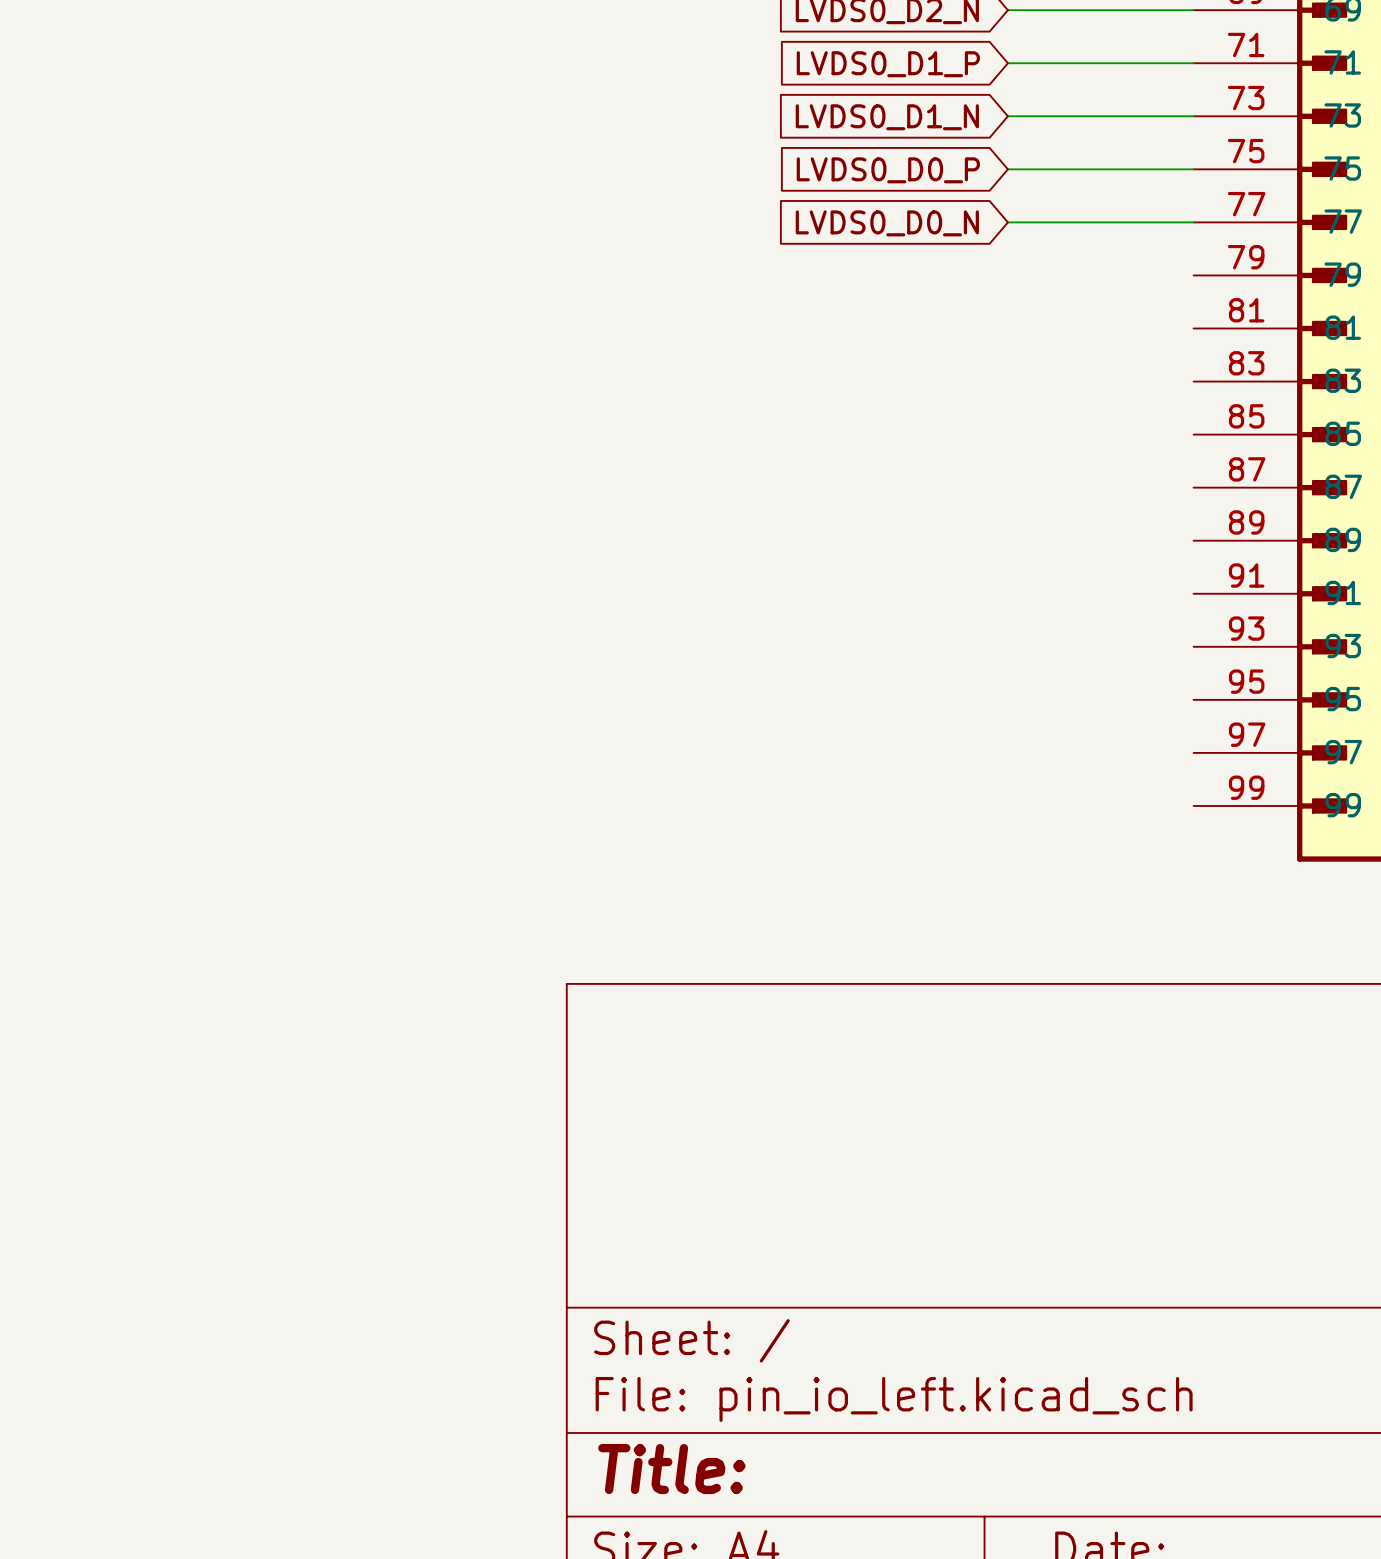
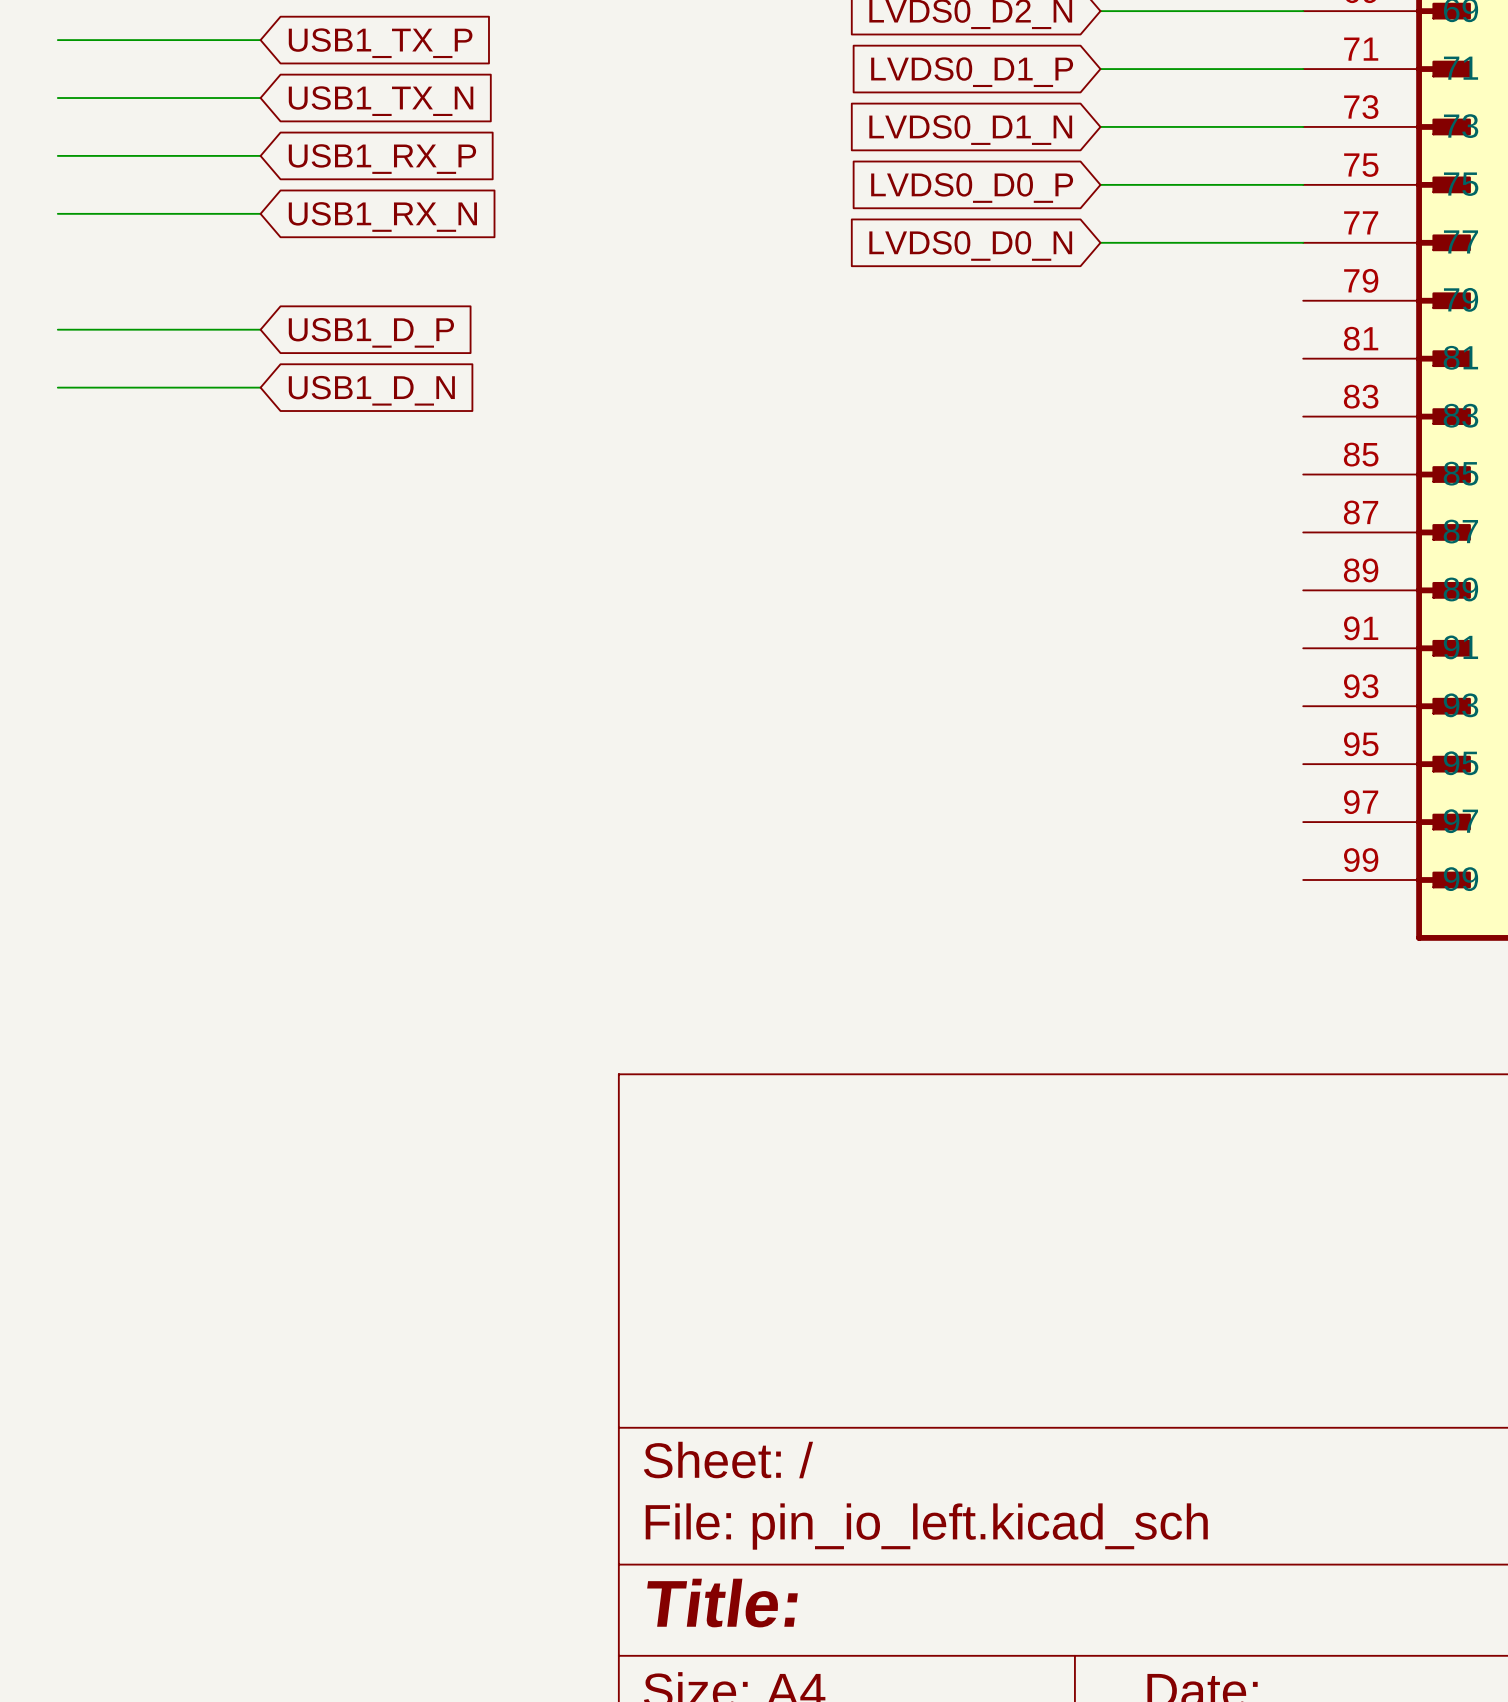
wire: none -> (57, 40) (260, 40)
global label: none -> USB1_TX_P (380, 43)
wire: none -> (57, 98) (260, 98)
global label: none -> USB1_TX_N (381, 101)
wire: none -> (57, 155) (260, 155)
global label: none -> USB1_RX_P (382, 159)
wire: none -> (57, 213) (260, 213)
global label: none -> USB1_RX_N (382, 216)
wire: none -> (57, 329) (260, 329)
global label: none -> USB1_D_P (371, 332)
wire: none -> (57, 387) (260, 387)
global label: none -> USB1_D_N (371, 390)

